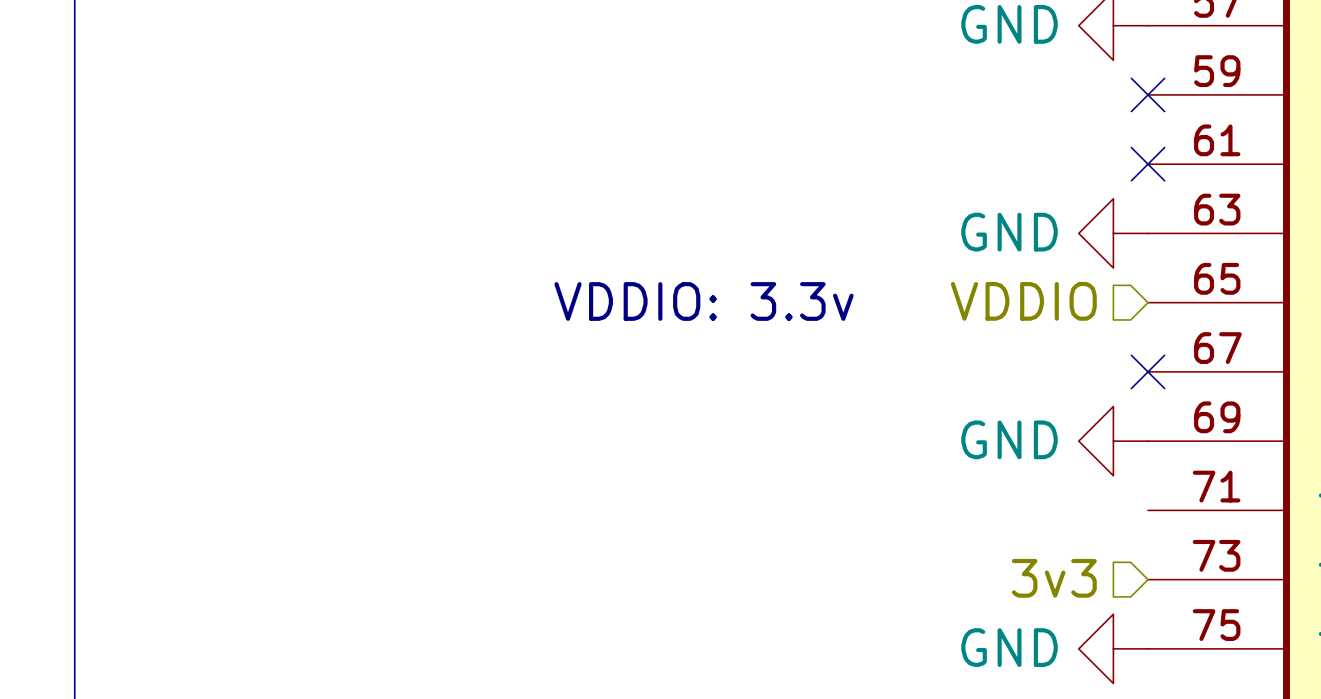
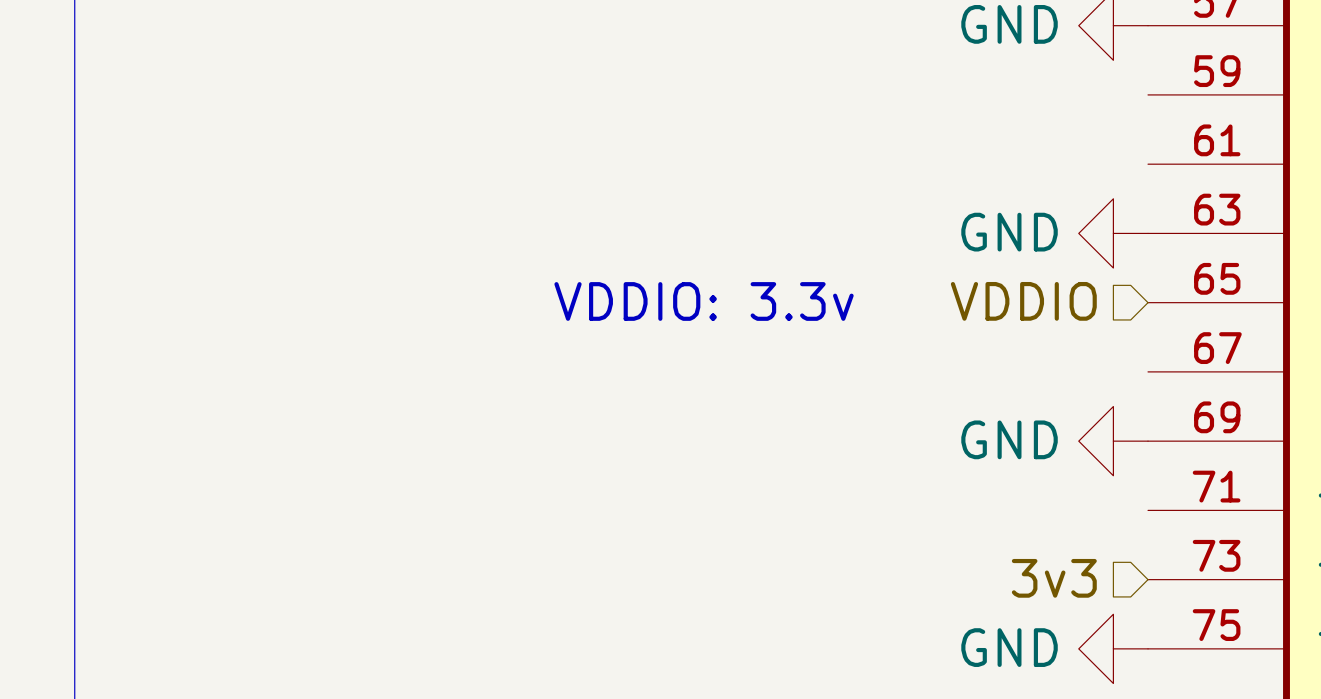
no-connect mark: (1148, 94) -> none
no-connect mark: (1148, 164) -> none
no-connect mark: (1148, 371) -> none

